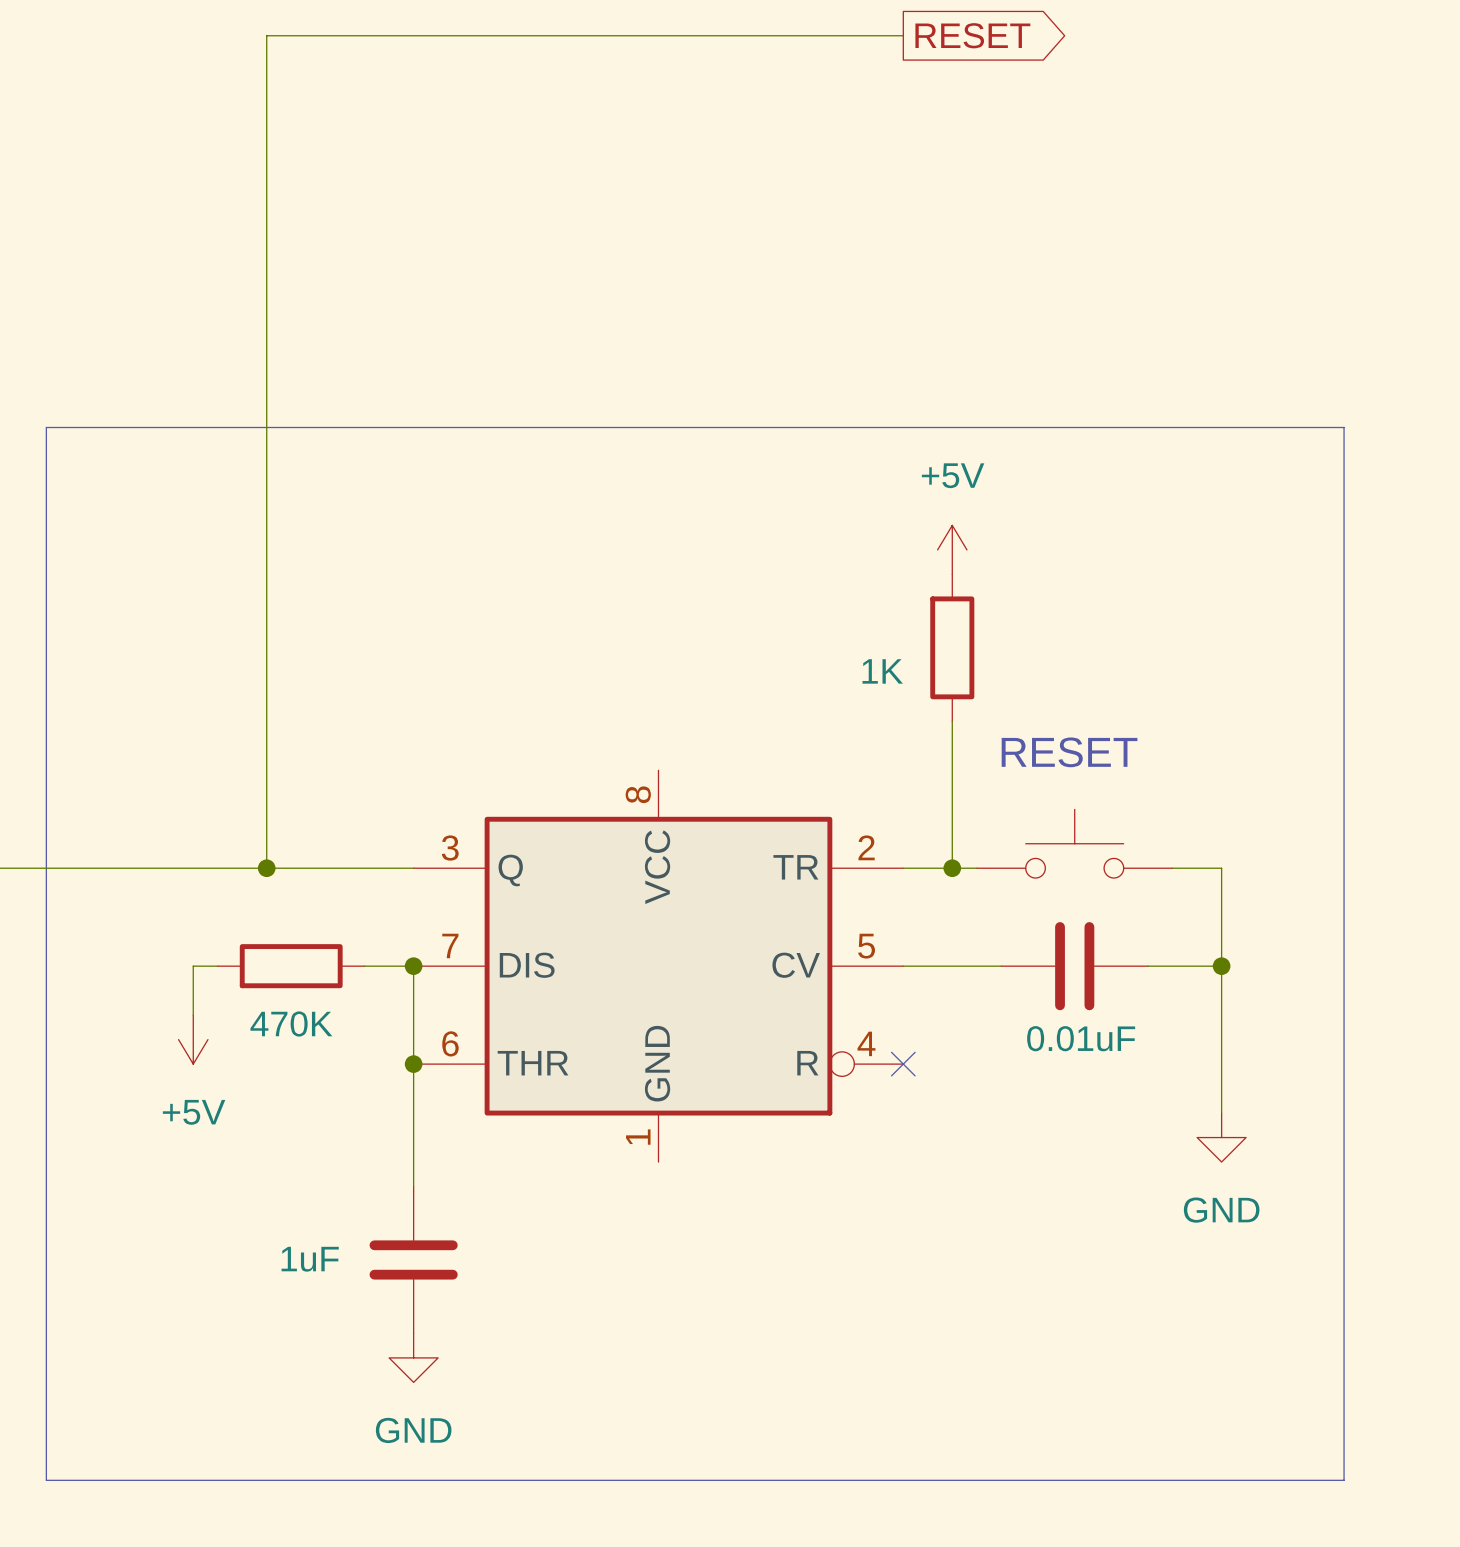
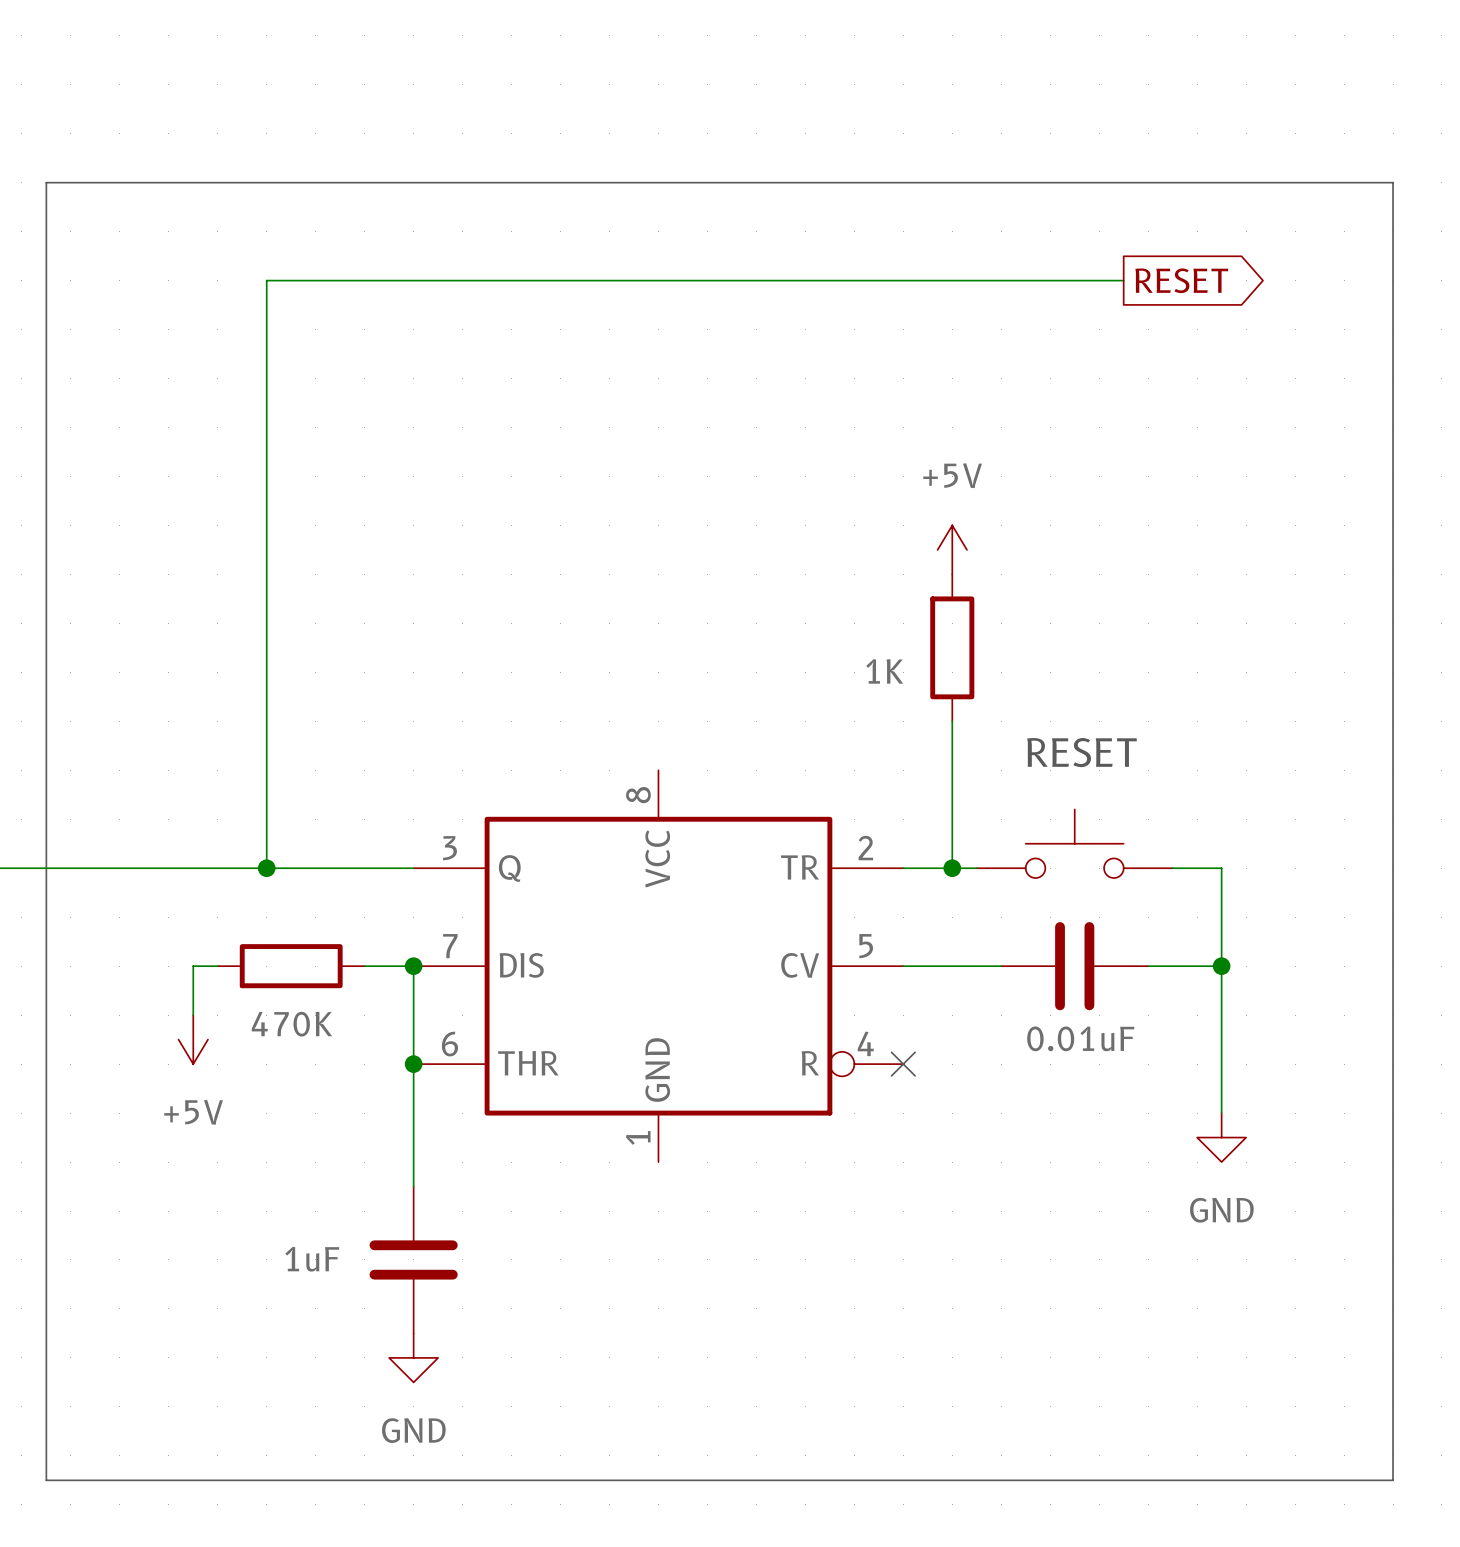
wire: (903, 35) (266, 35) (266, 280) -> (1123, 280) (266, 280)
global label position: RESET (972, 35) -> RESET (1181, 280)
line: (46, 427) (1344, 427) (1344, 1480) -> (46, 427) (46, 182) (1393, 182) (1393, 1480) (1344, 1480)

